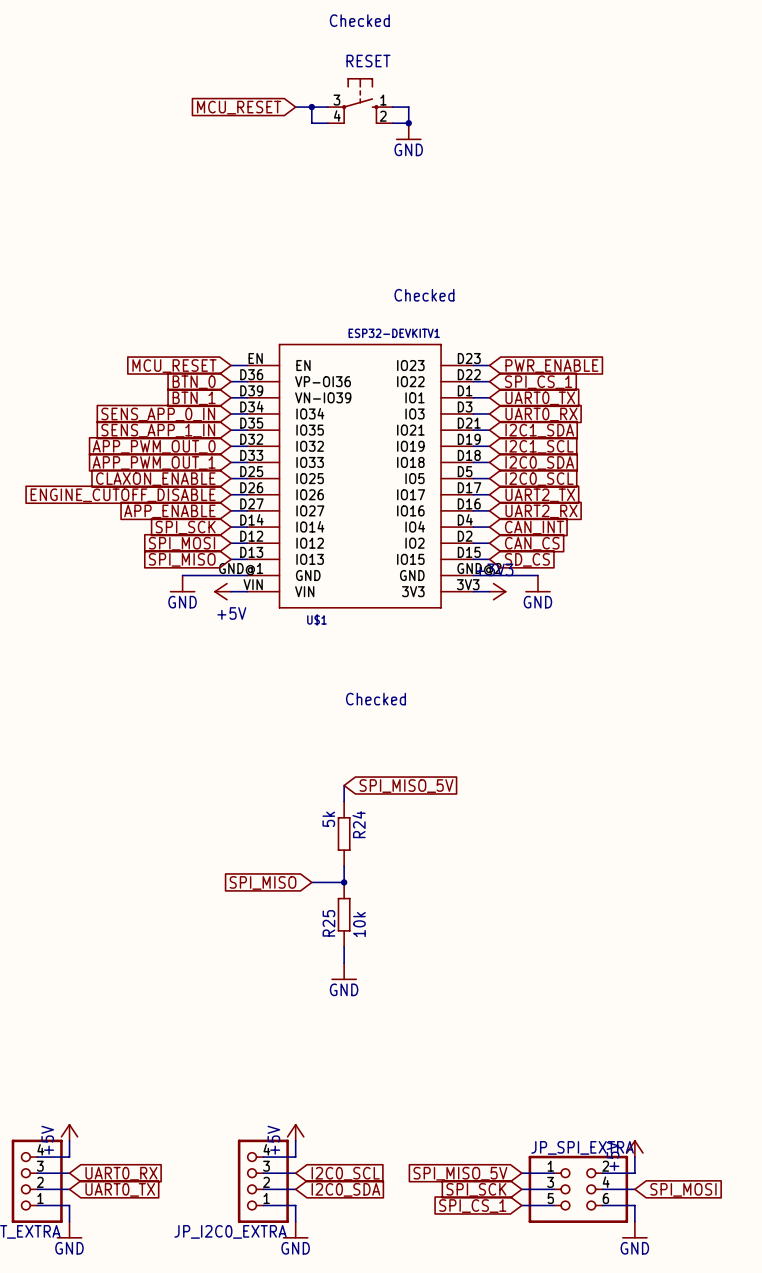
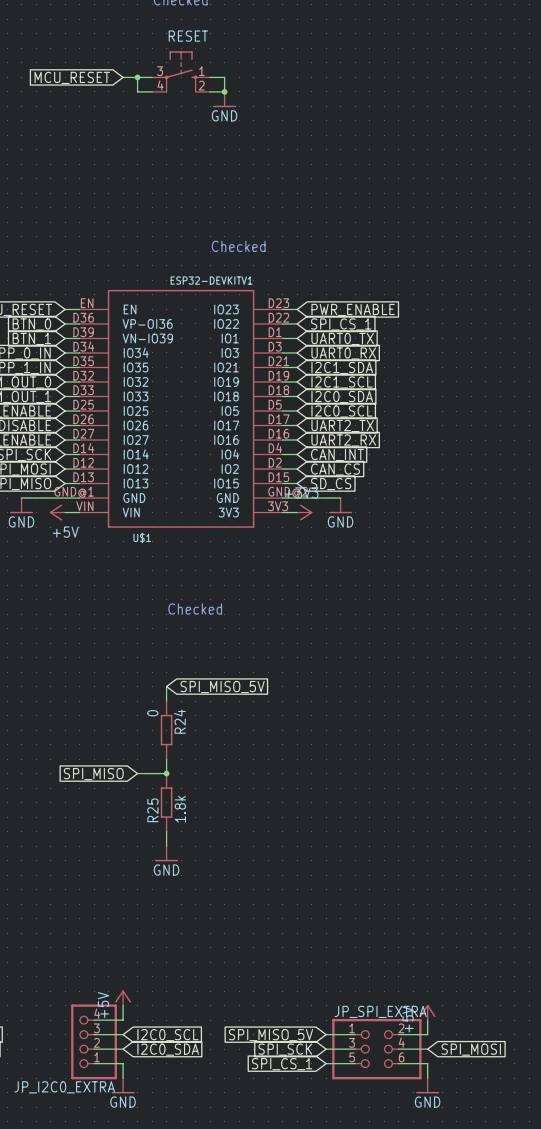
R24 value: 5k (328, 819) -> 0 (152, 713)
R25 value: 10k (359, 924) -> 1.8k (180, 809)

